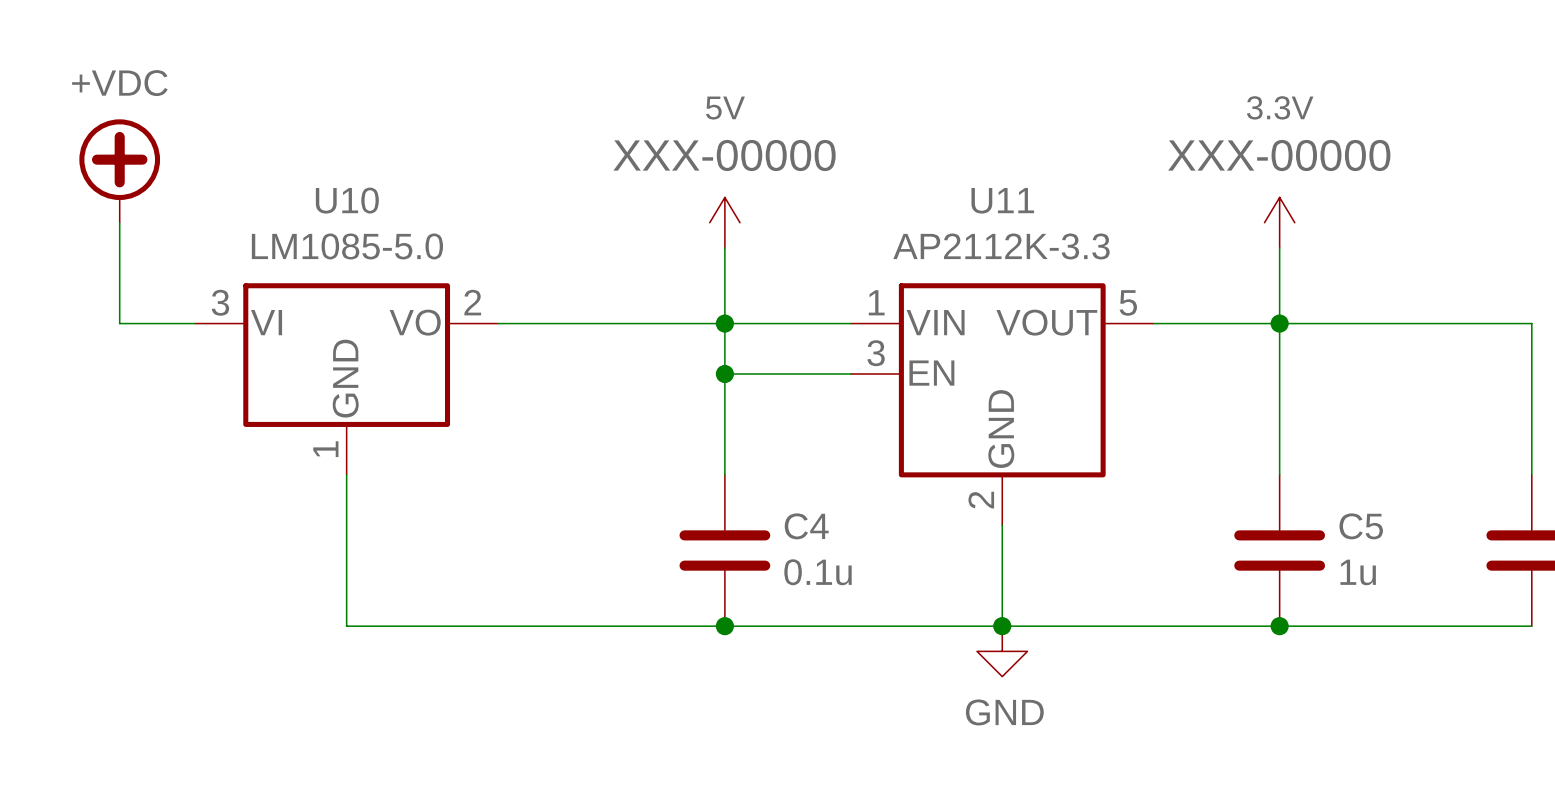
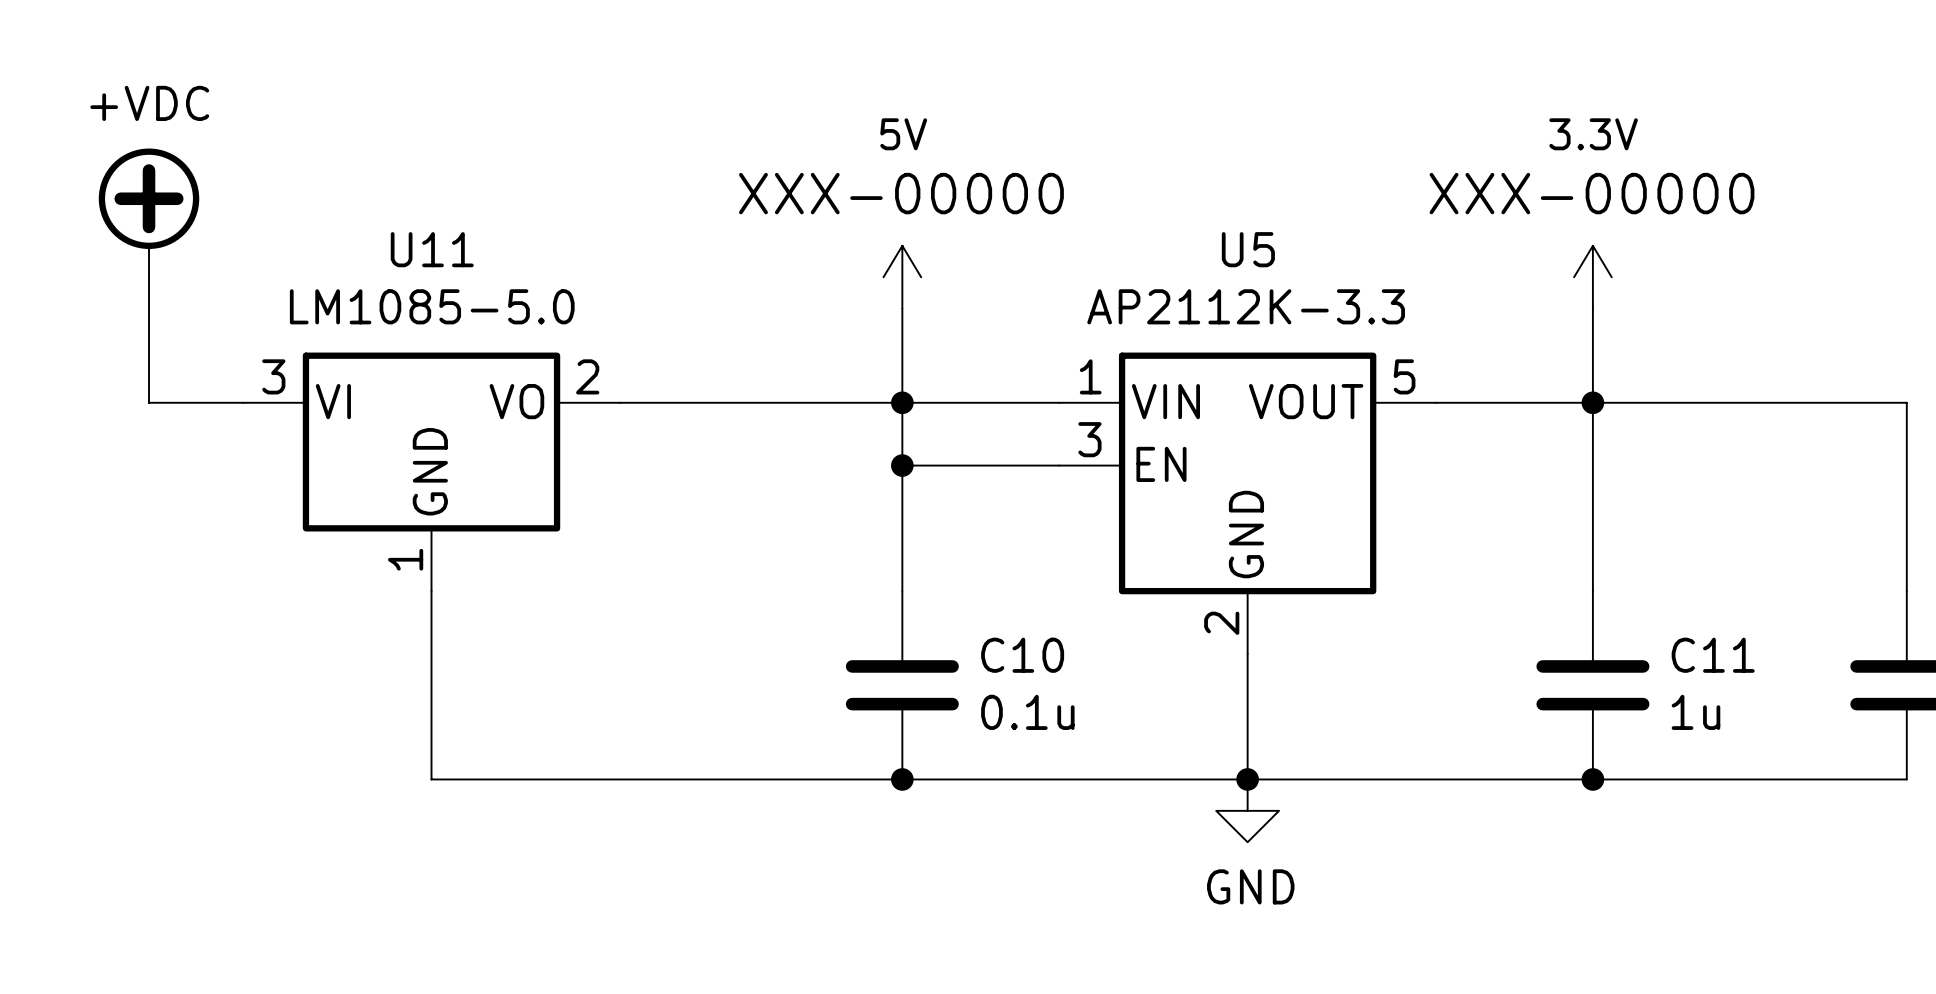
U10 name: U10 (347, 200) -> U11 (432, 249)
U11 name: U11 (1002, 200) -> U5 (1248, 249)
C4 name: C4 (806, 526) -> C10 (1022, 655)
C5 name: C5 (1361, 526) -> C11 (1713, 655)

